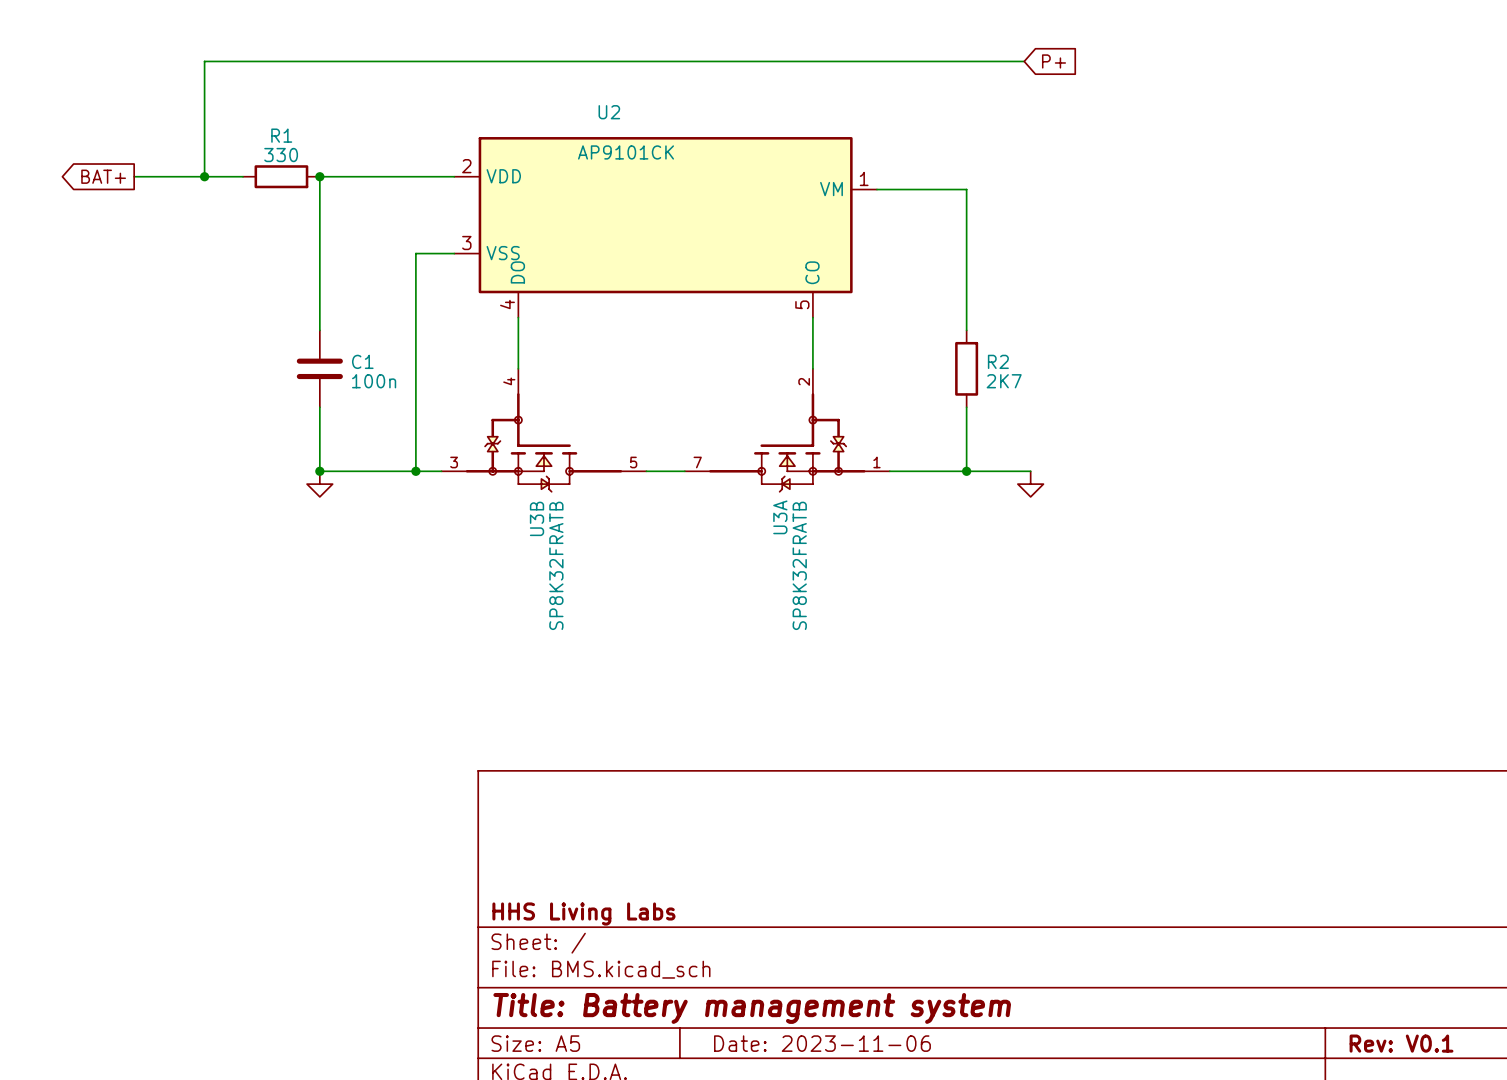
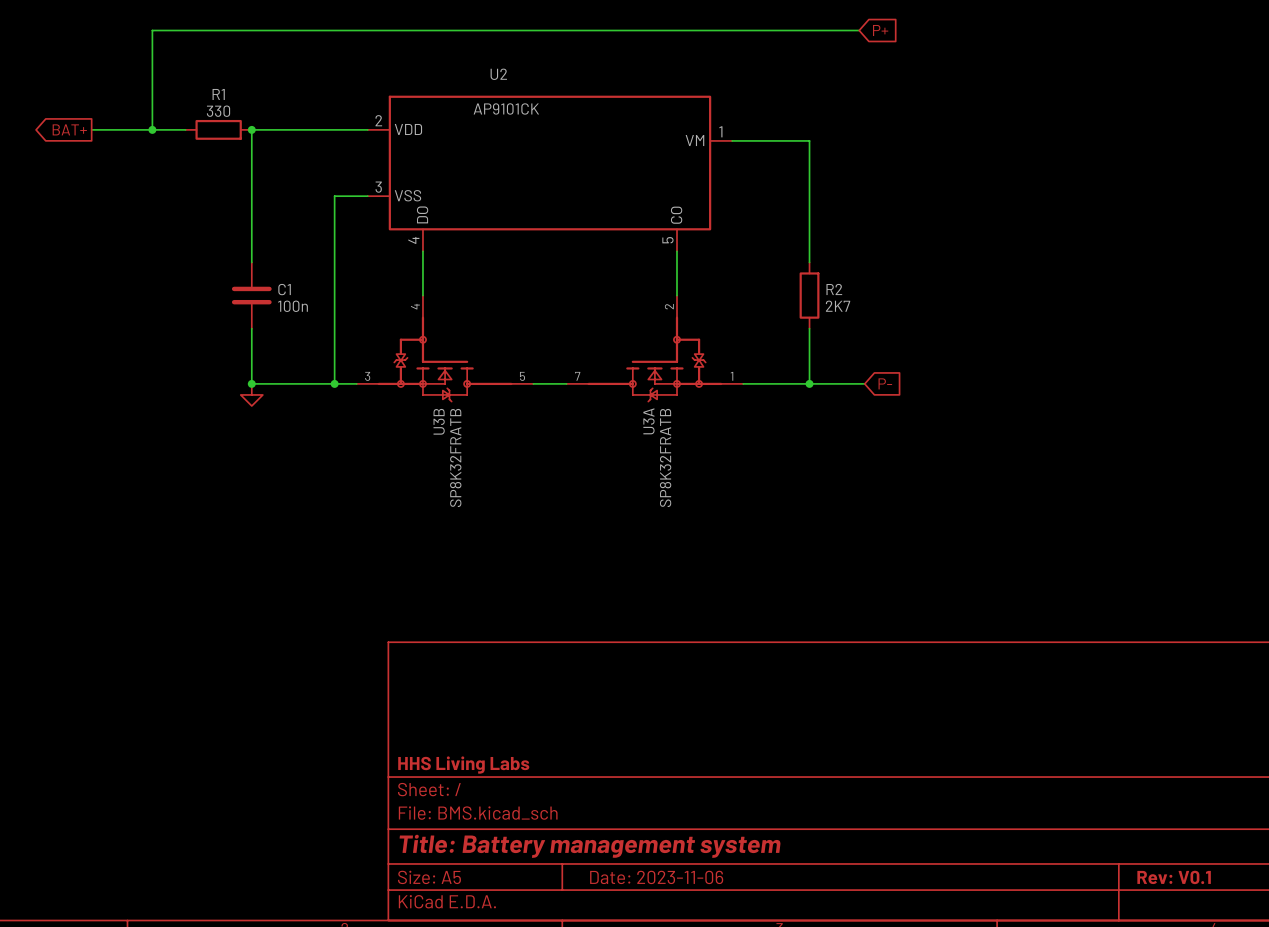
global label: none -> P- (885, 383)
power symbol: (1030, 484) -> none

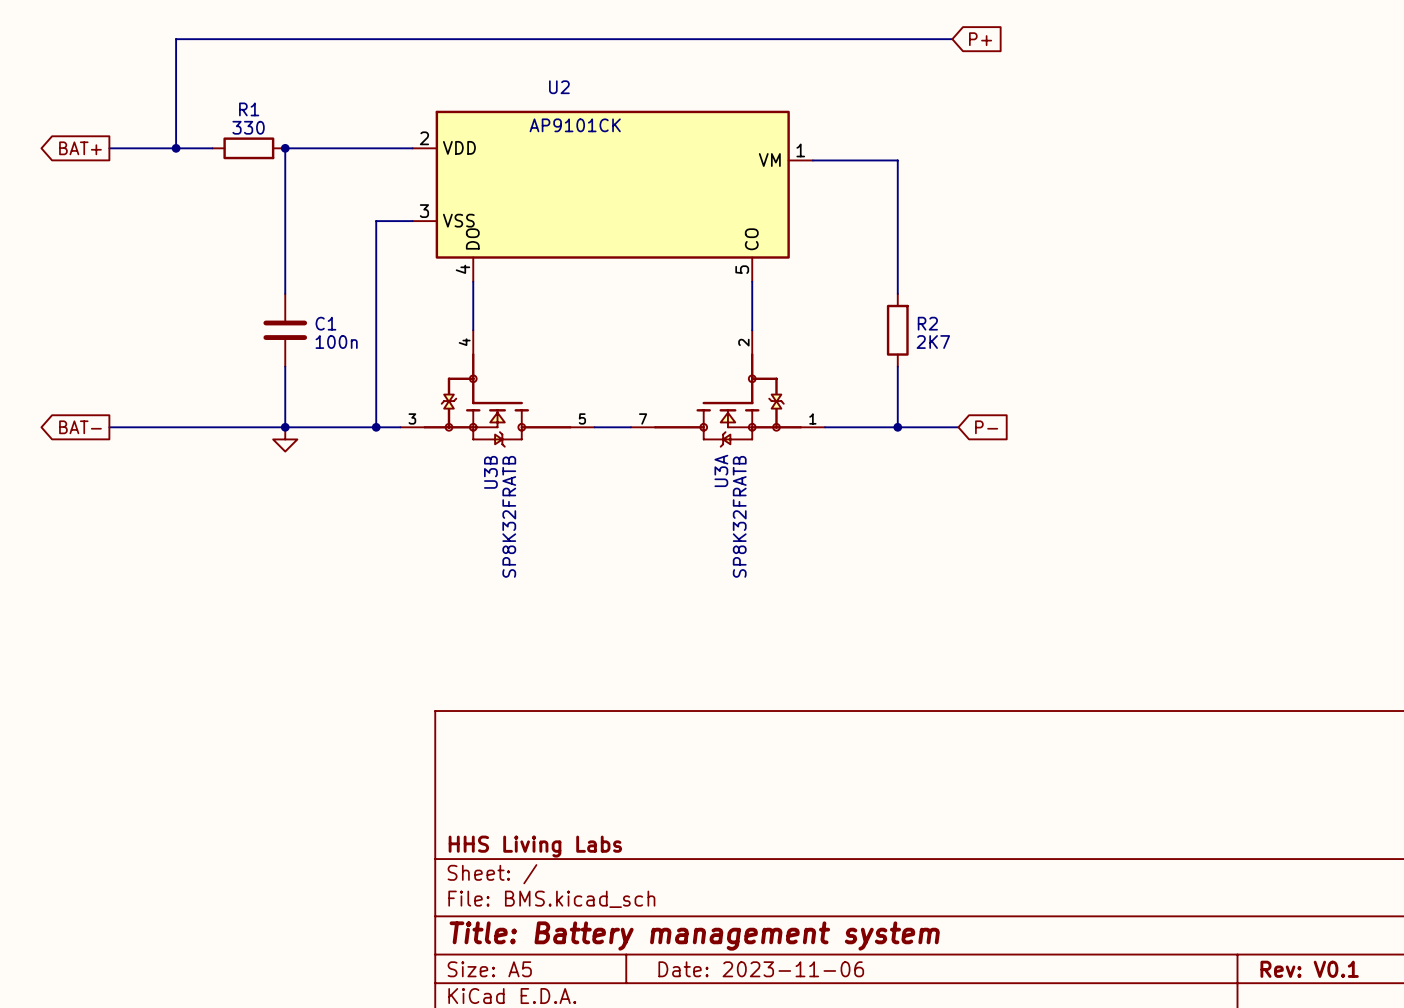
global label: none -> BAT- (80, 427)
wire: none -> (109, 427) (285, 427)

